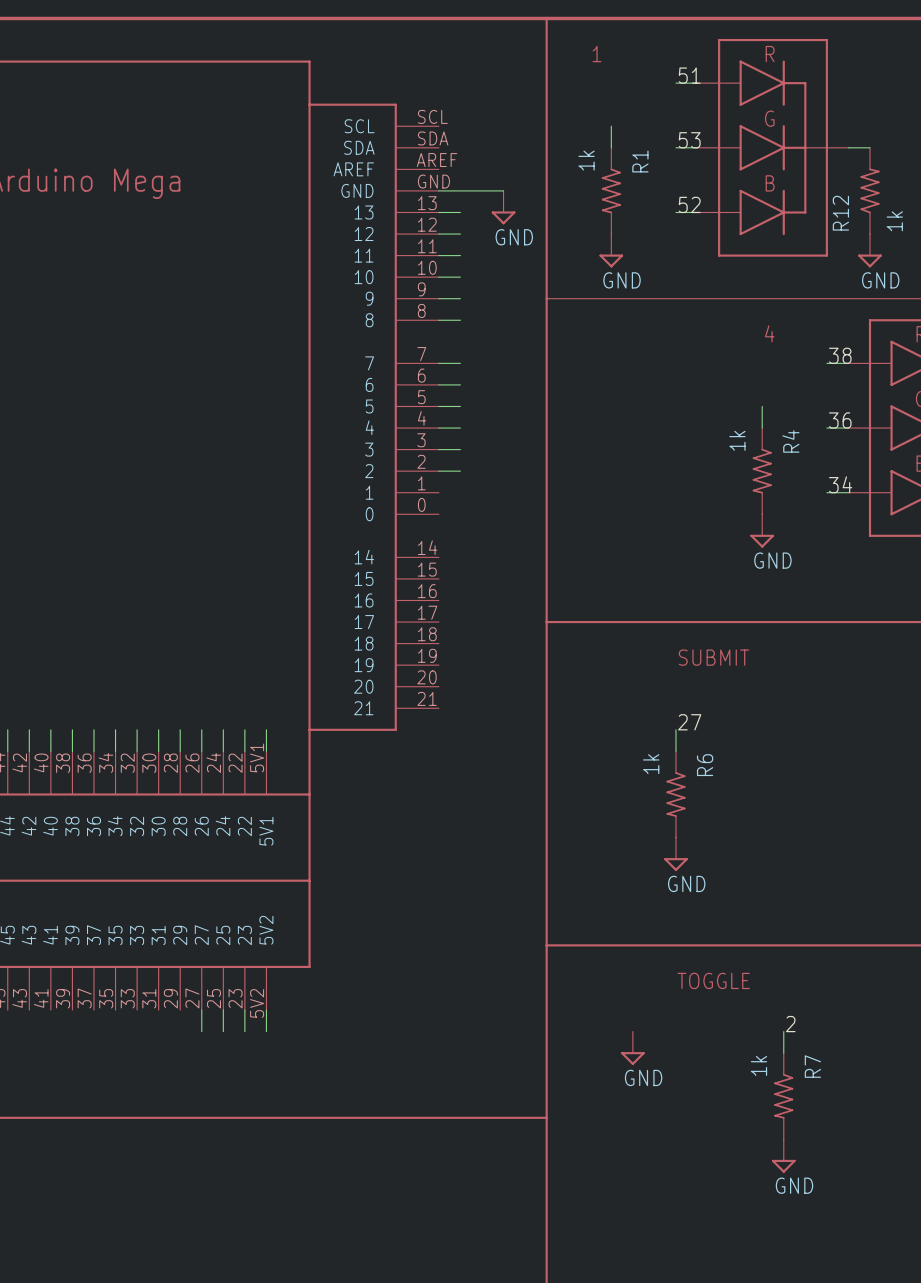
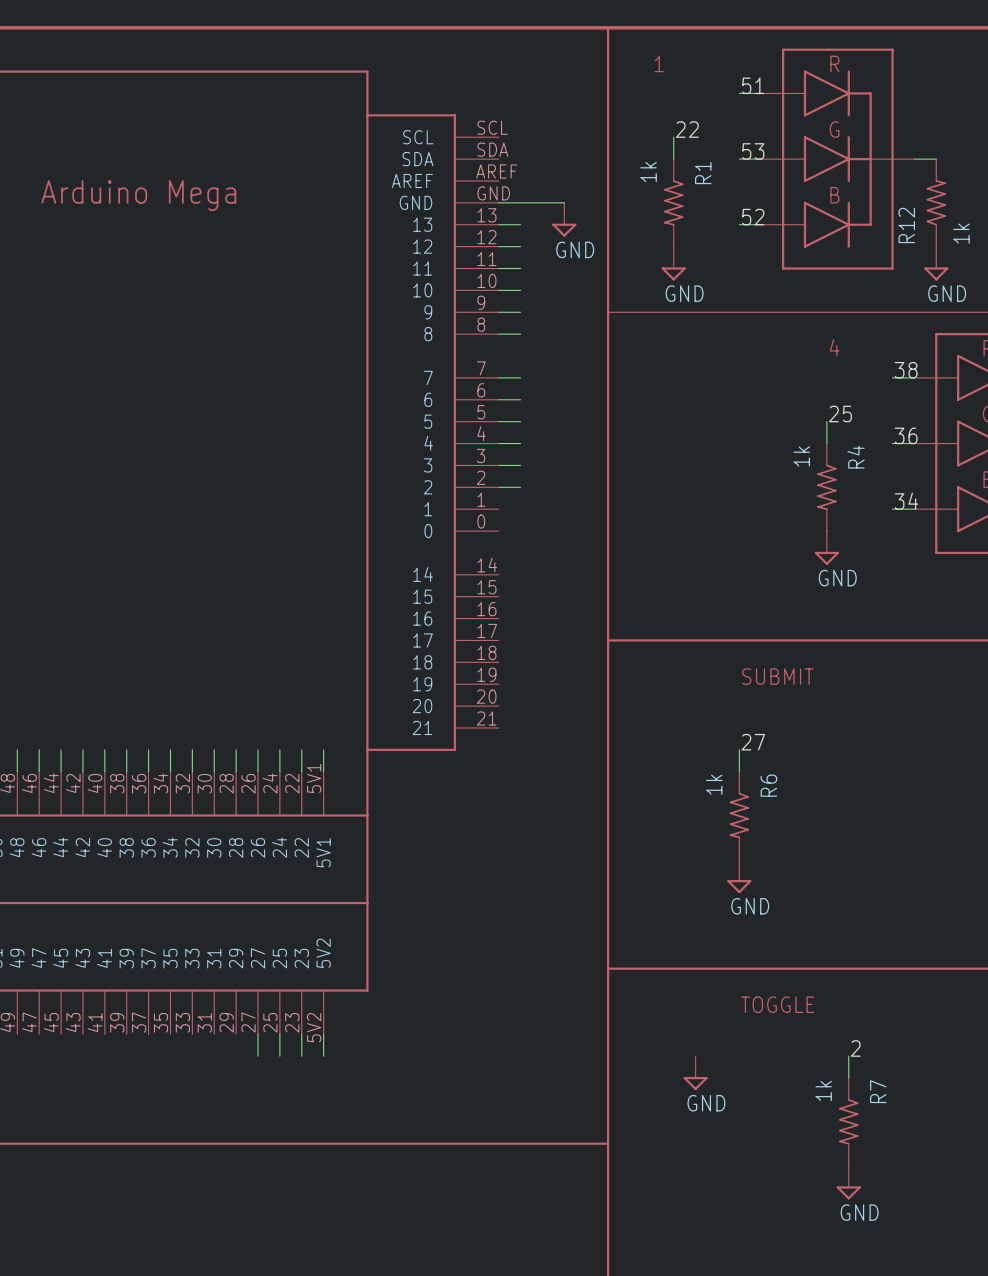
label: none -> 22 (687, 129)
label: none -> 25 (840, 414)

